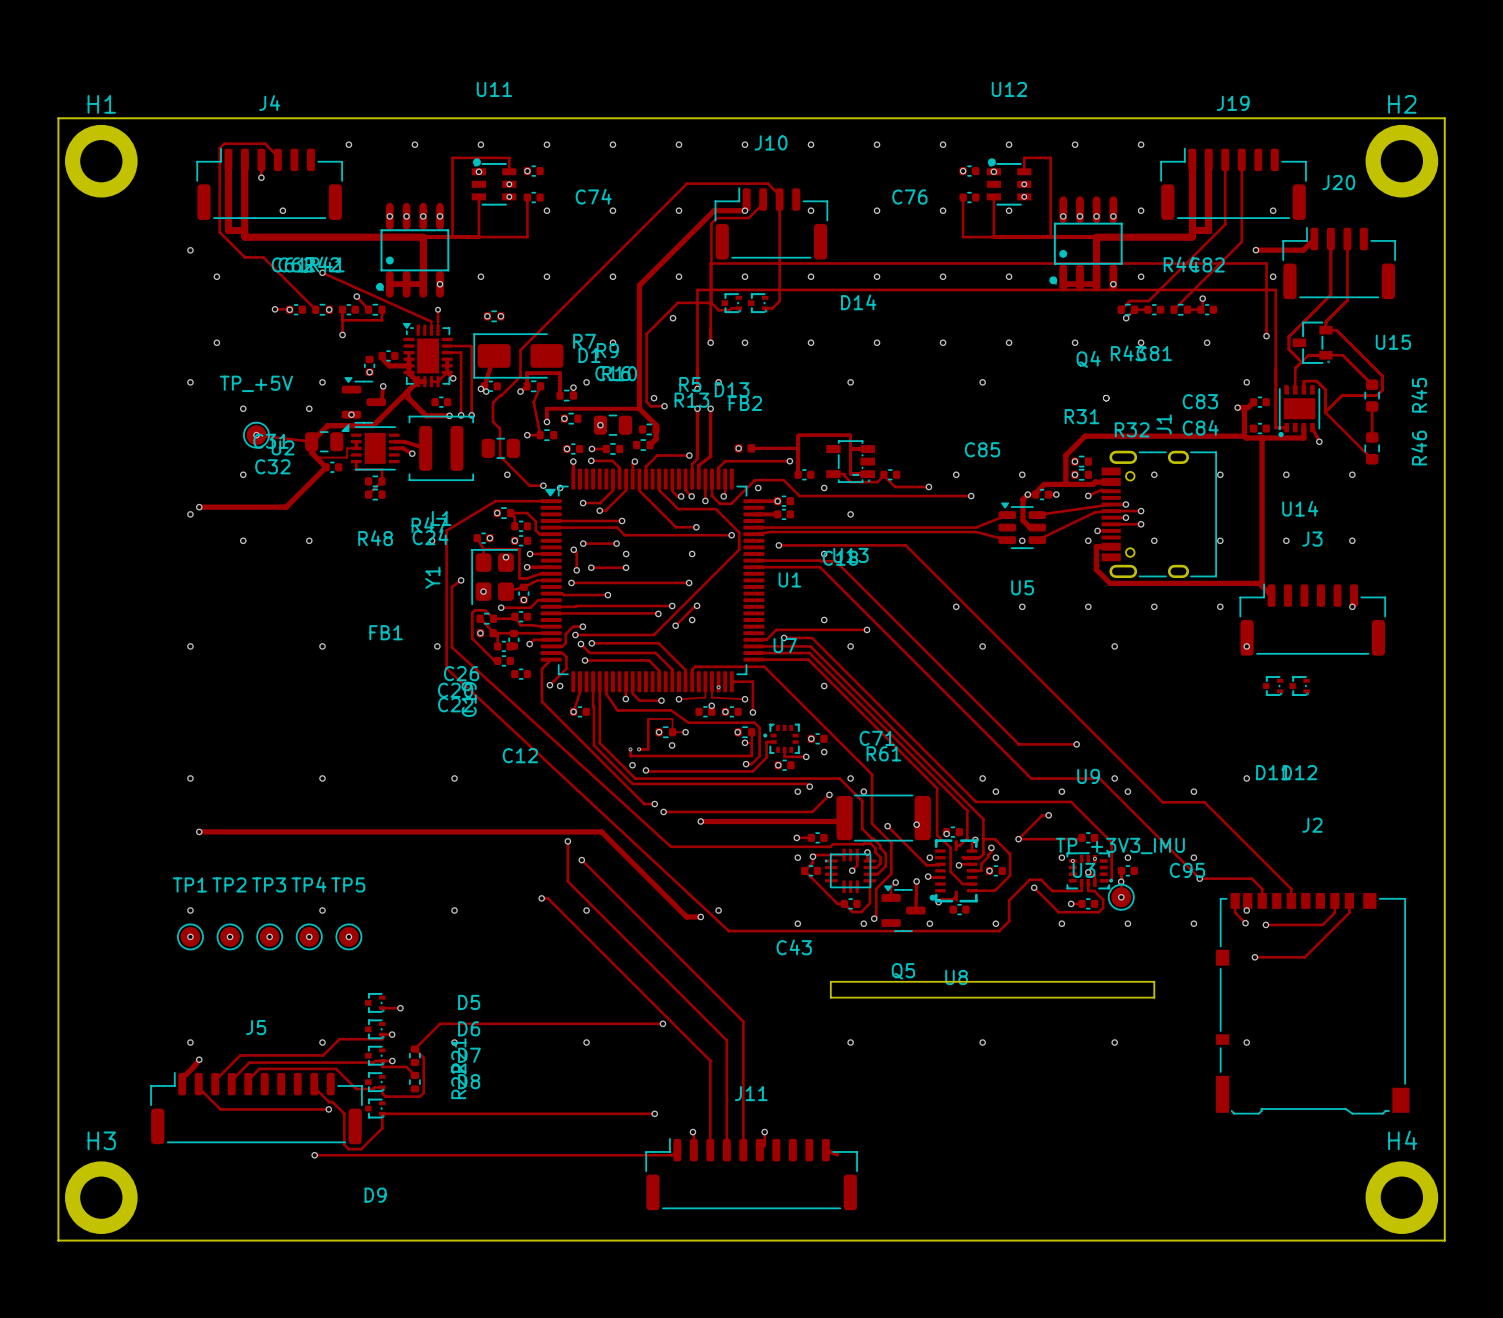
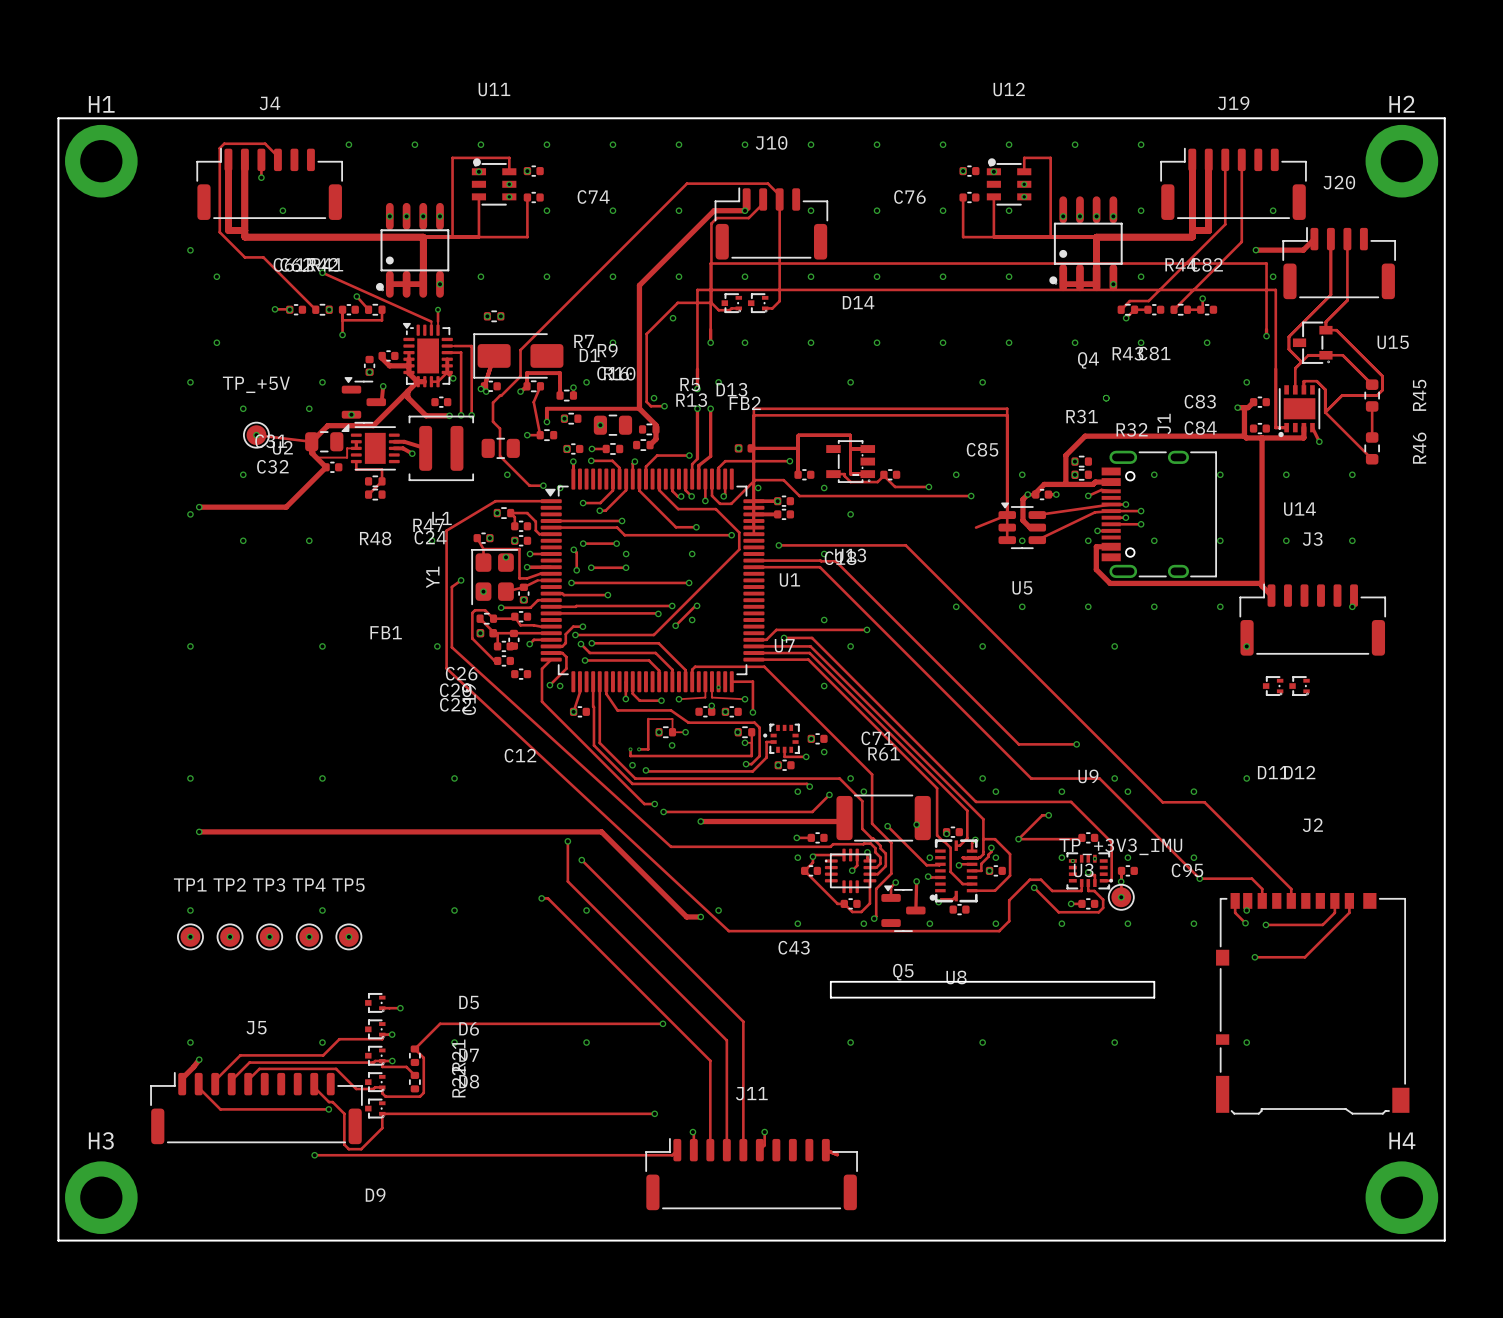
track: none -> (753, 415) (1007, 415)
track: (753, 527) (976, 527) -> none
track: (753, 534) (771, 531) (976, 531) (1007, 540) -> (753, 534) (753, 408) (1007, 408) (1007, 540)

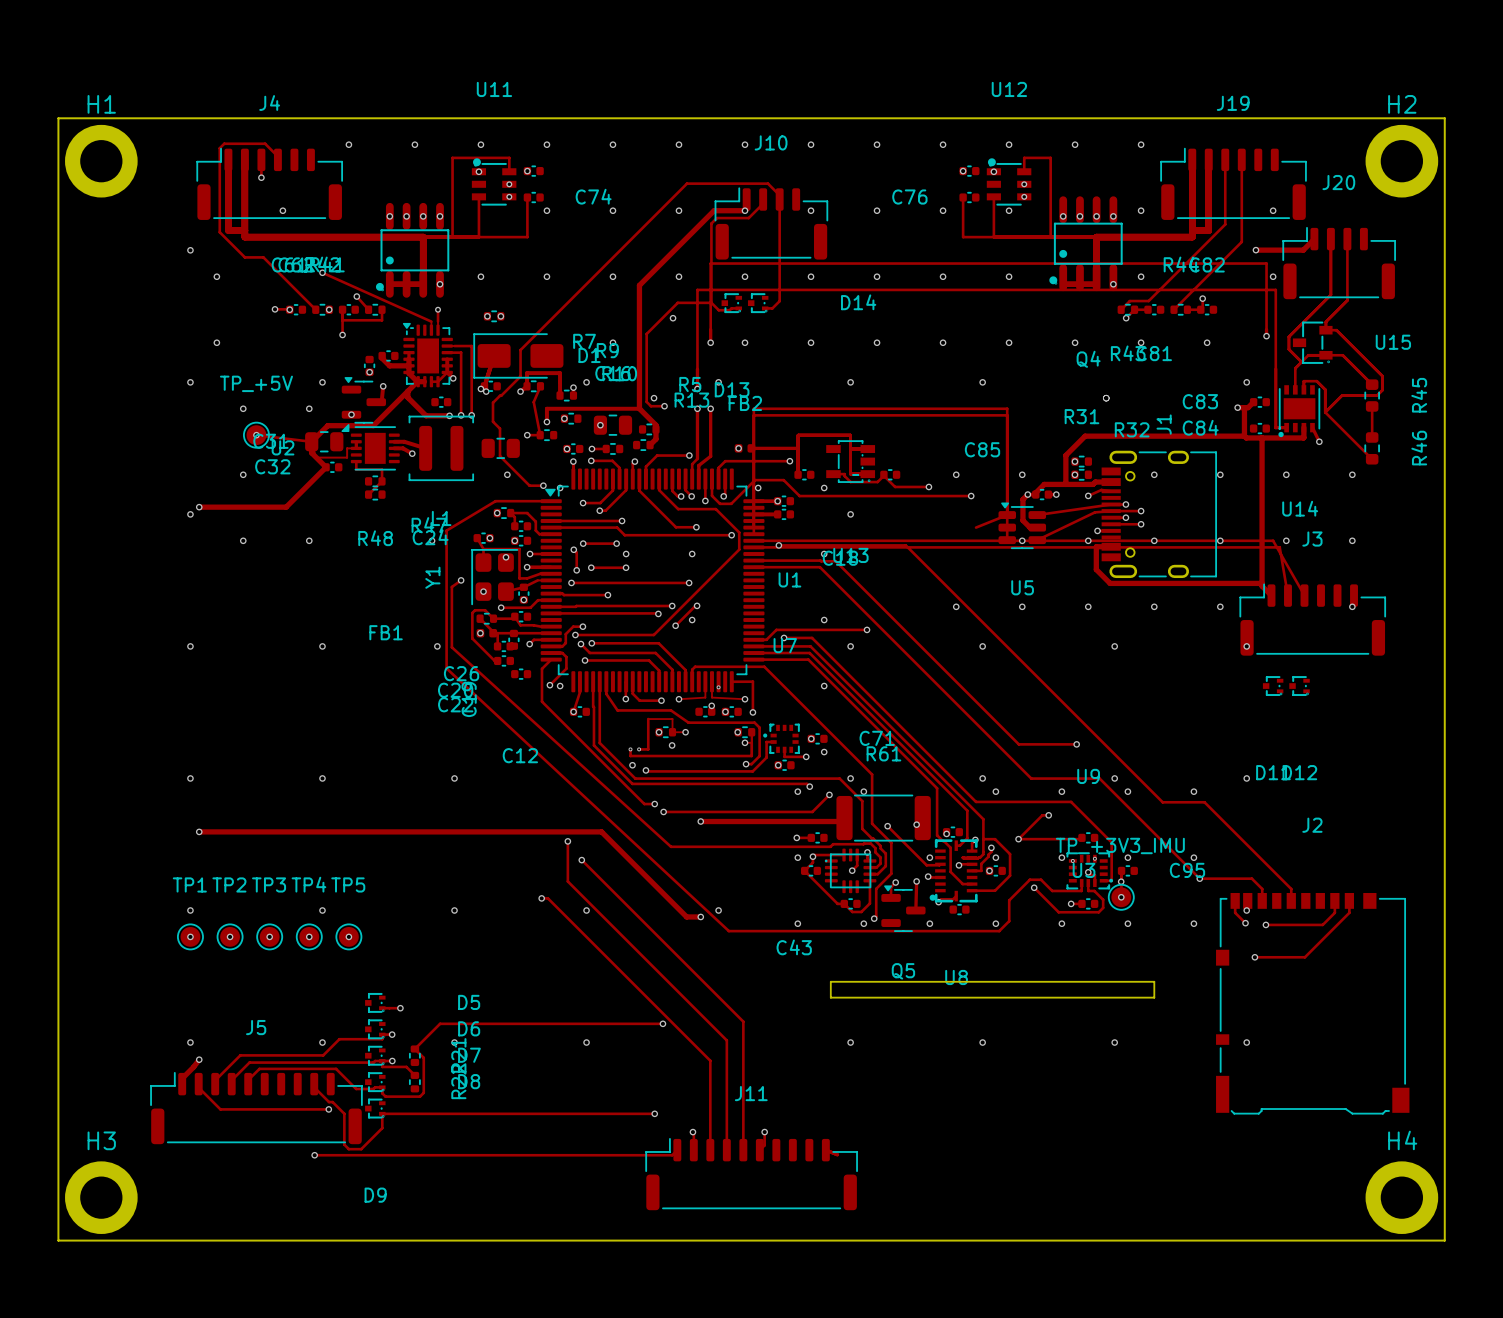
track: none -> (753, 540) (1273, 540) (1304, 595)
track: none -> (753, 547) (1279, 547) (1287, 595)

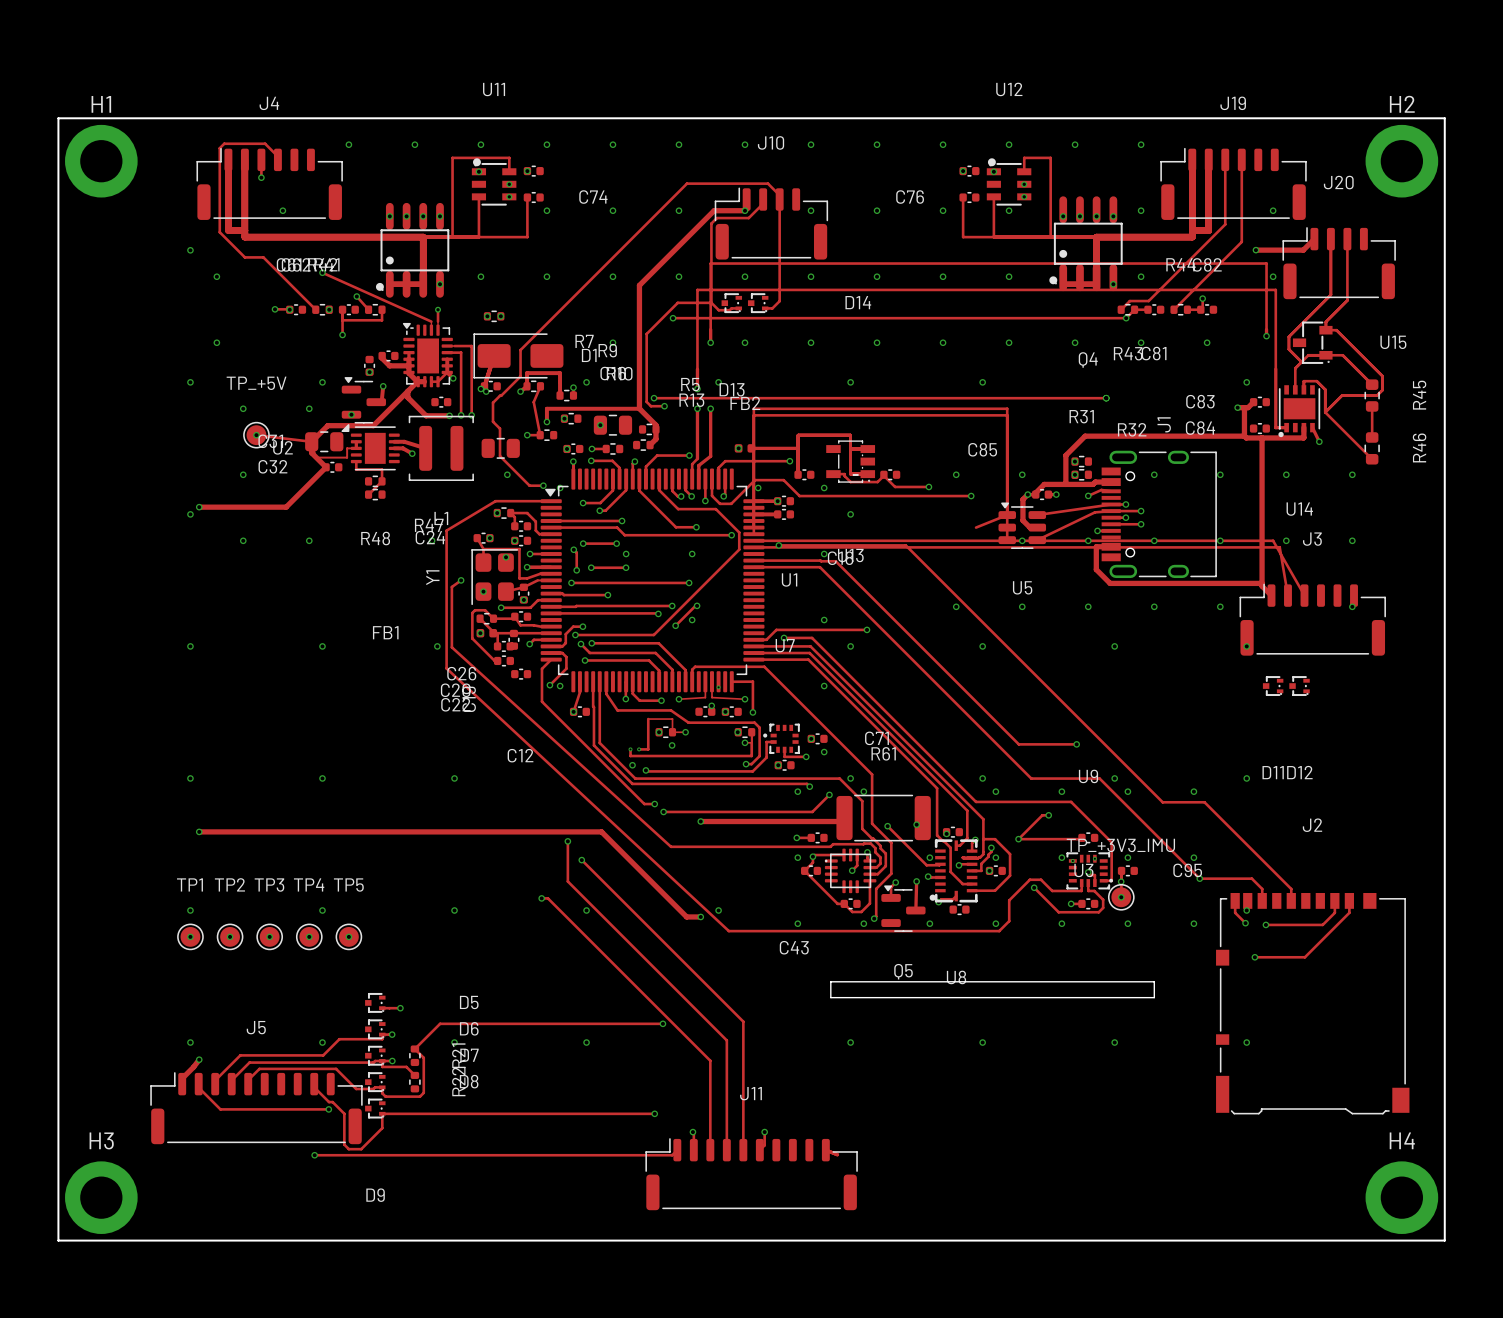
track: none -> (673, 318) (1126, 318)
track: none -> (654, 398) (1106, 398)

